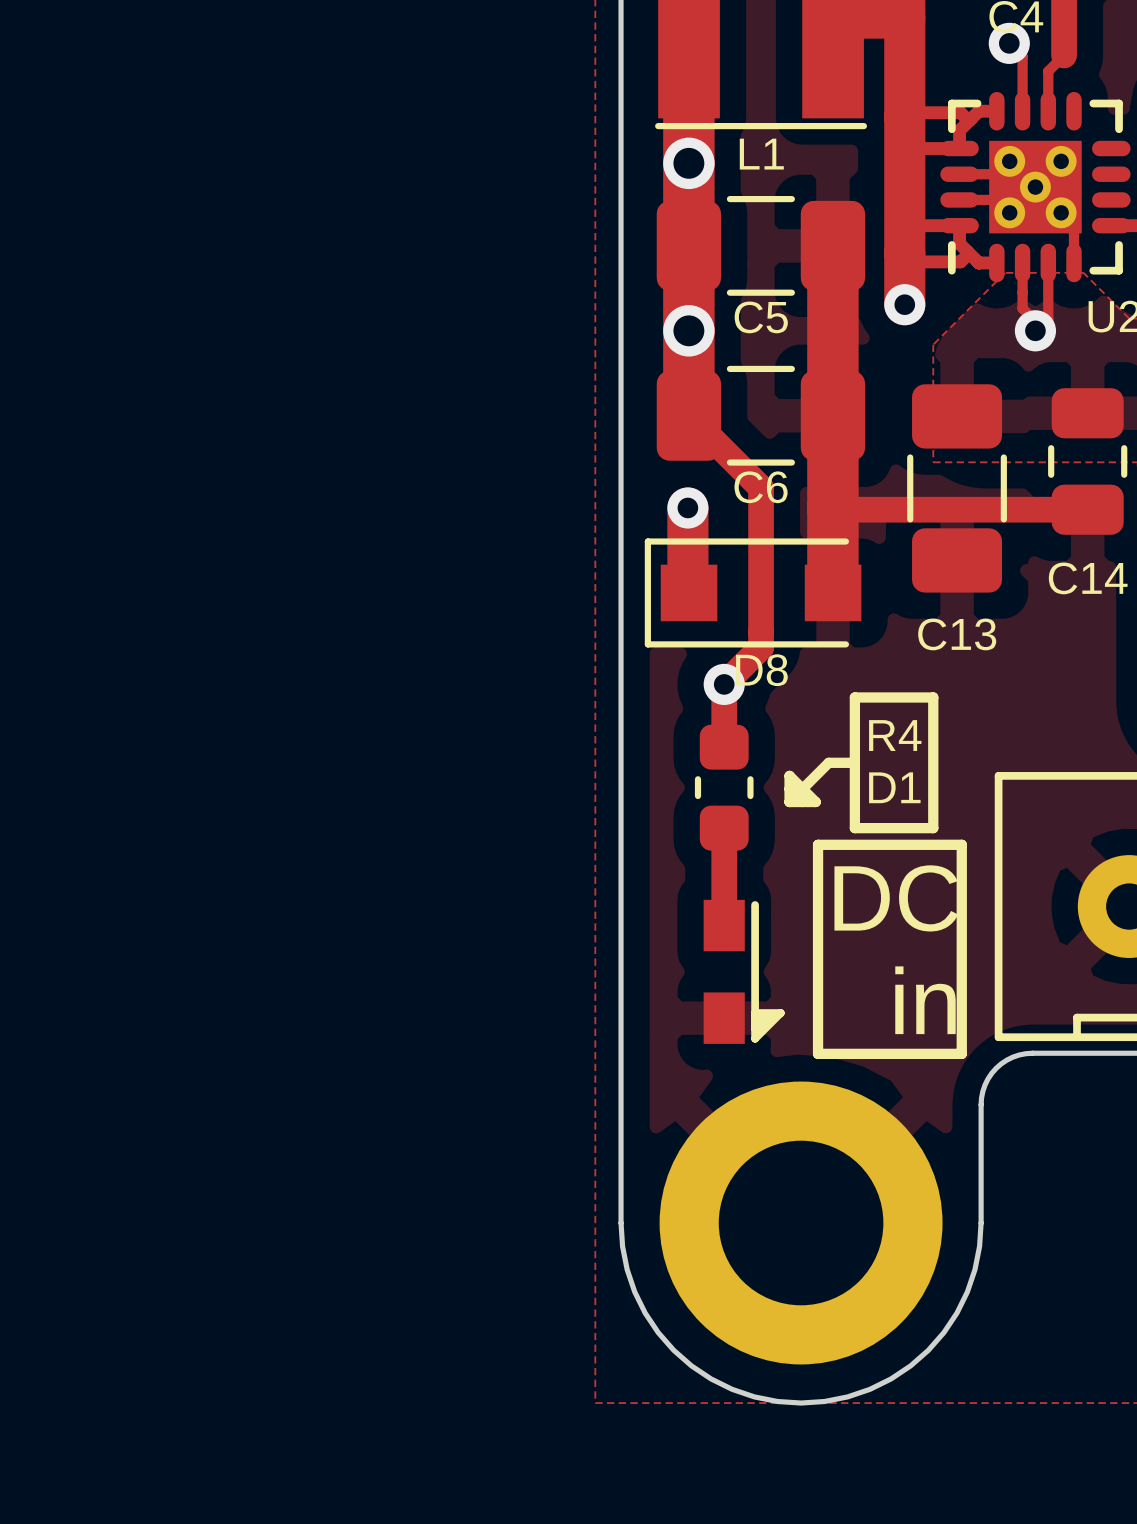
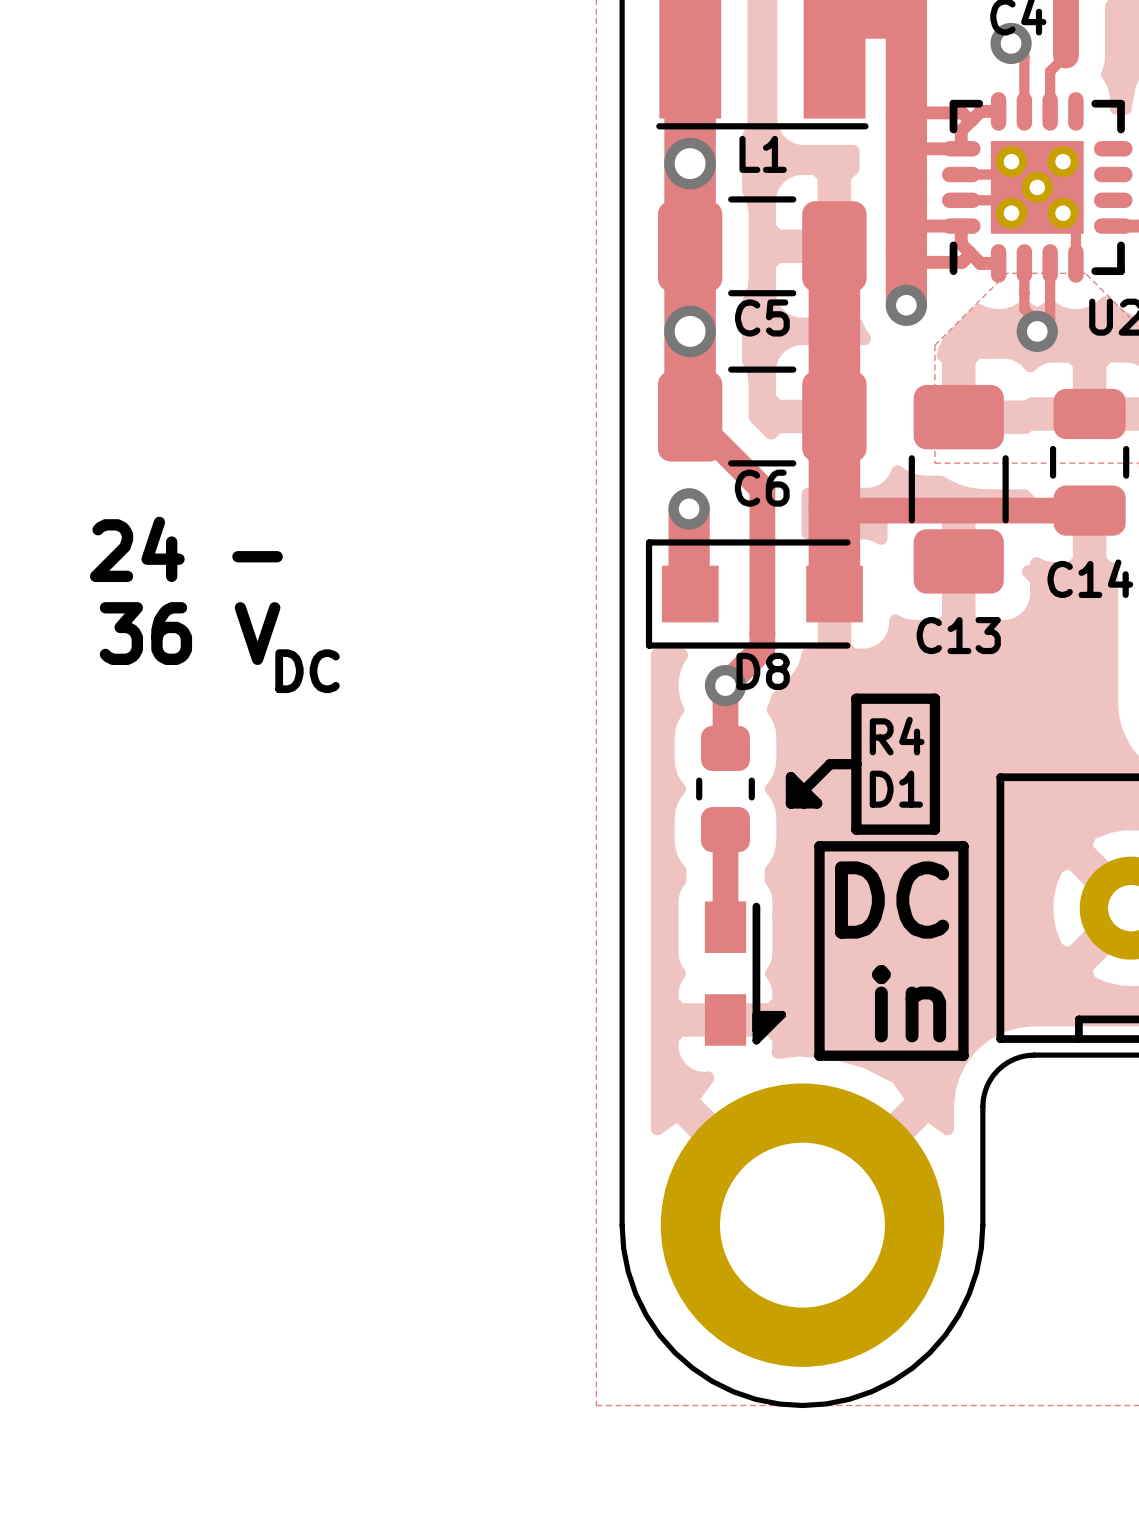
text: none -> 24 - (186, 549)
text: none -> 36 V (190, 633)
text: none -> DC (307, 671)

